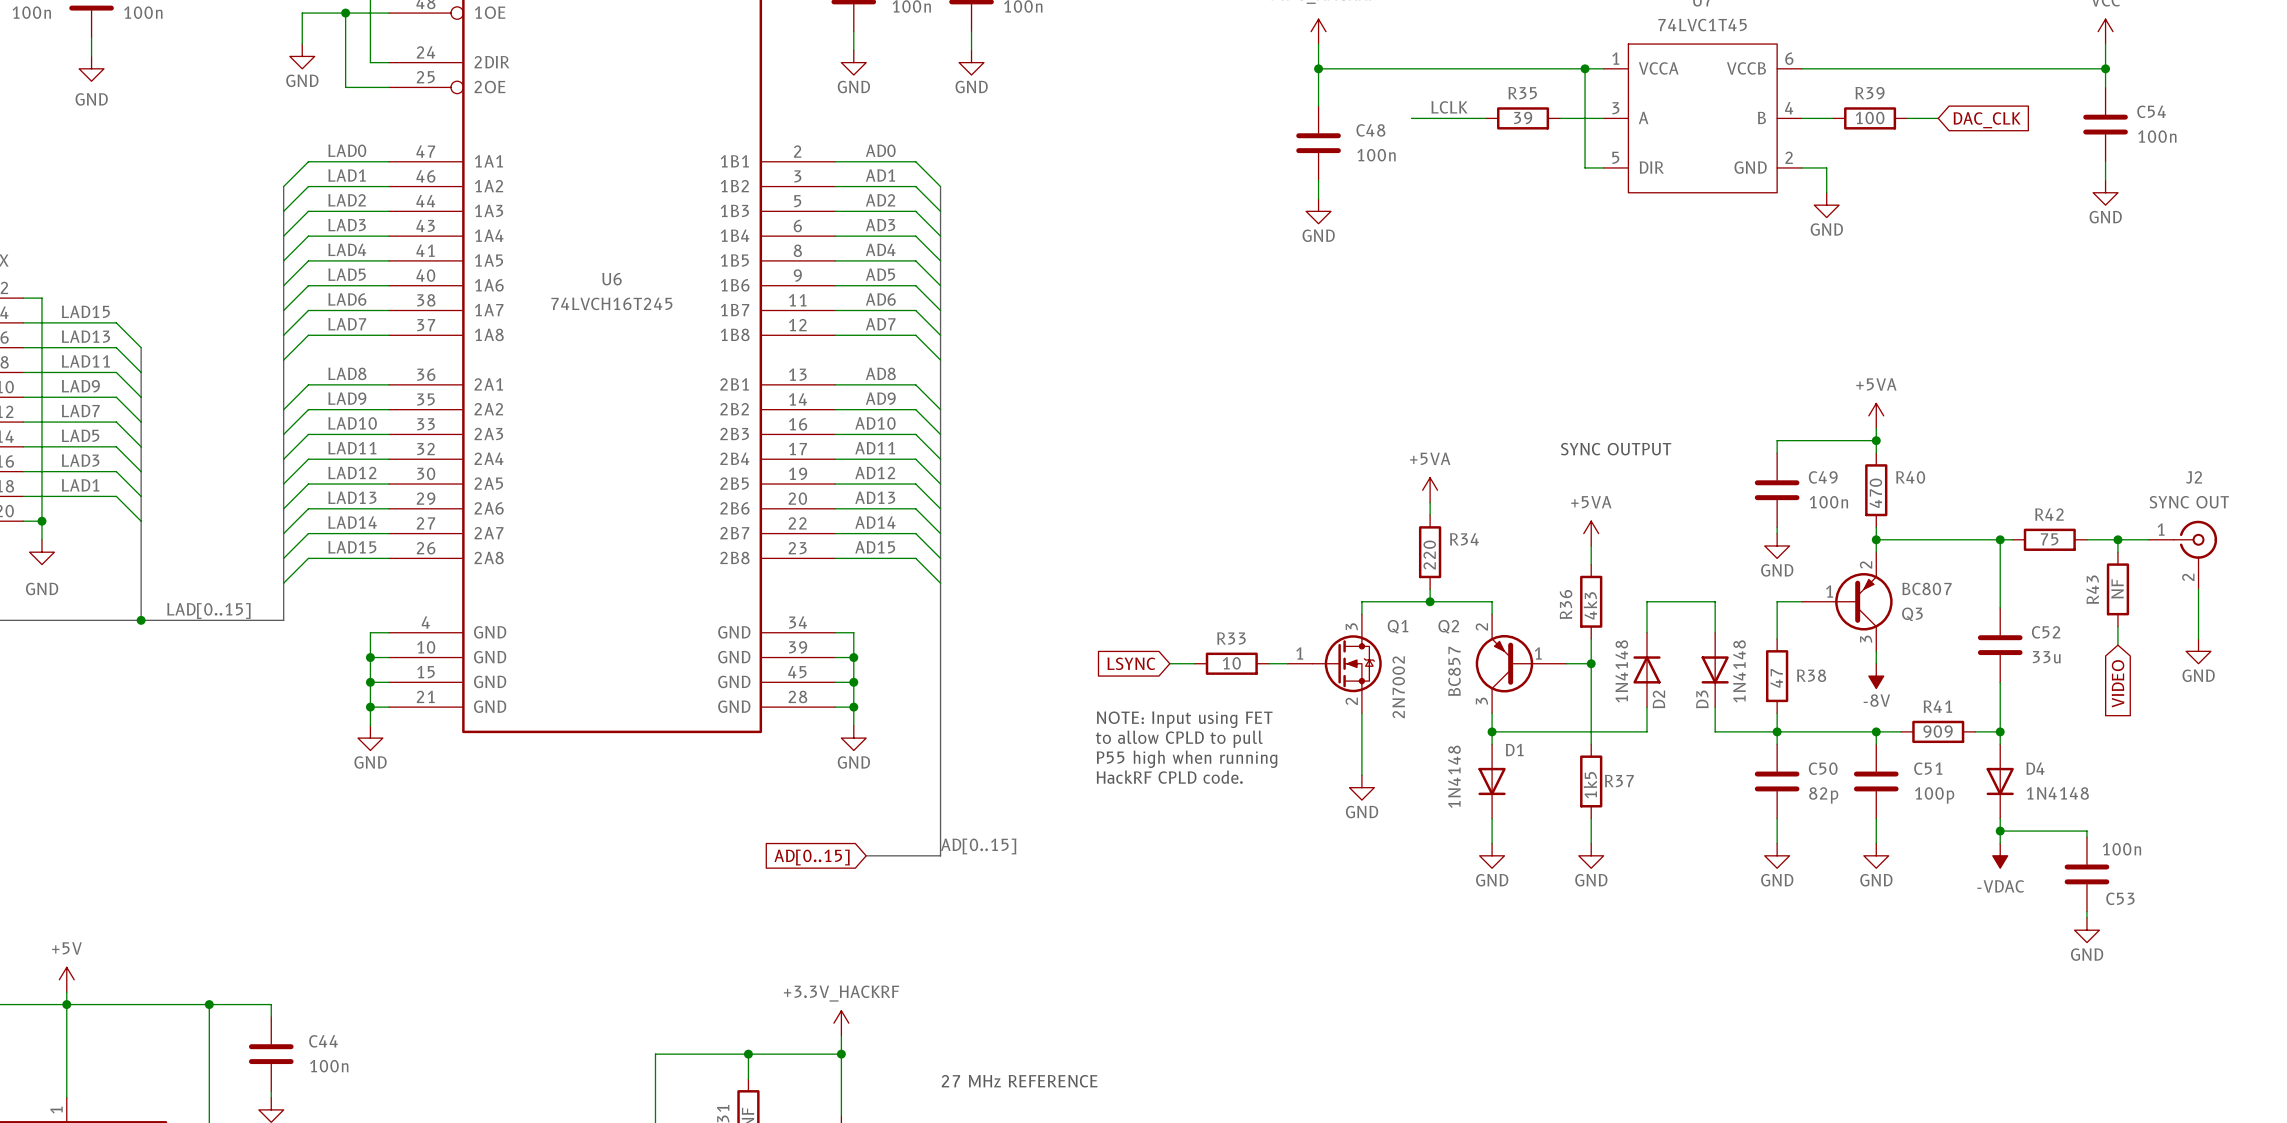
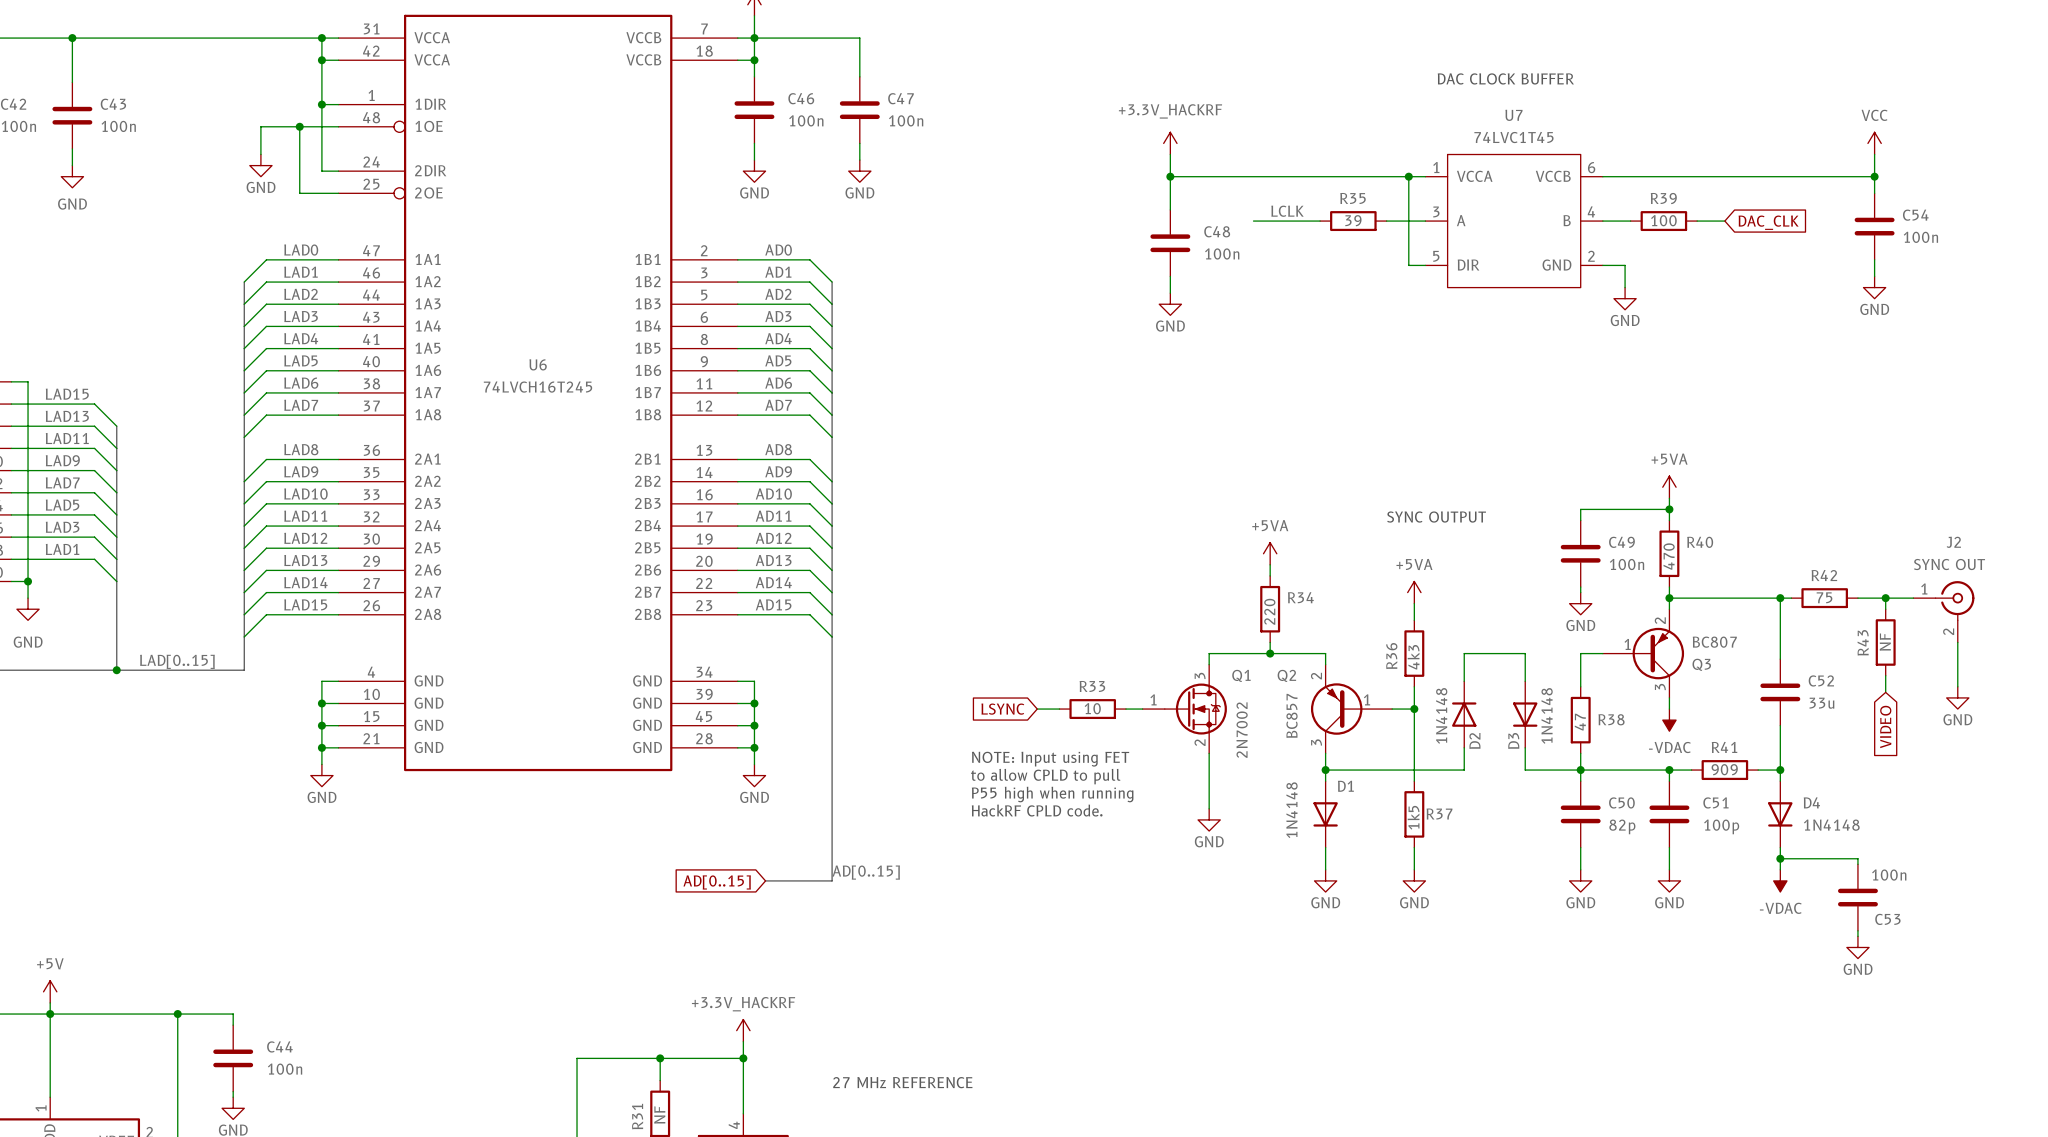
power symbol: -8V (1876, 676) -> -VDAC (1669, 720)

